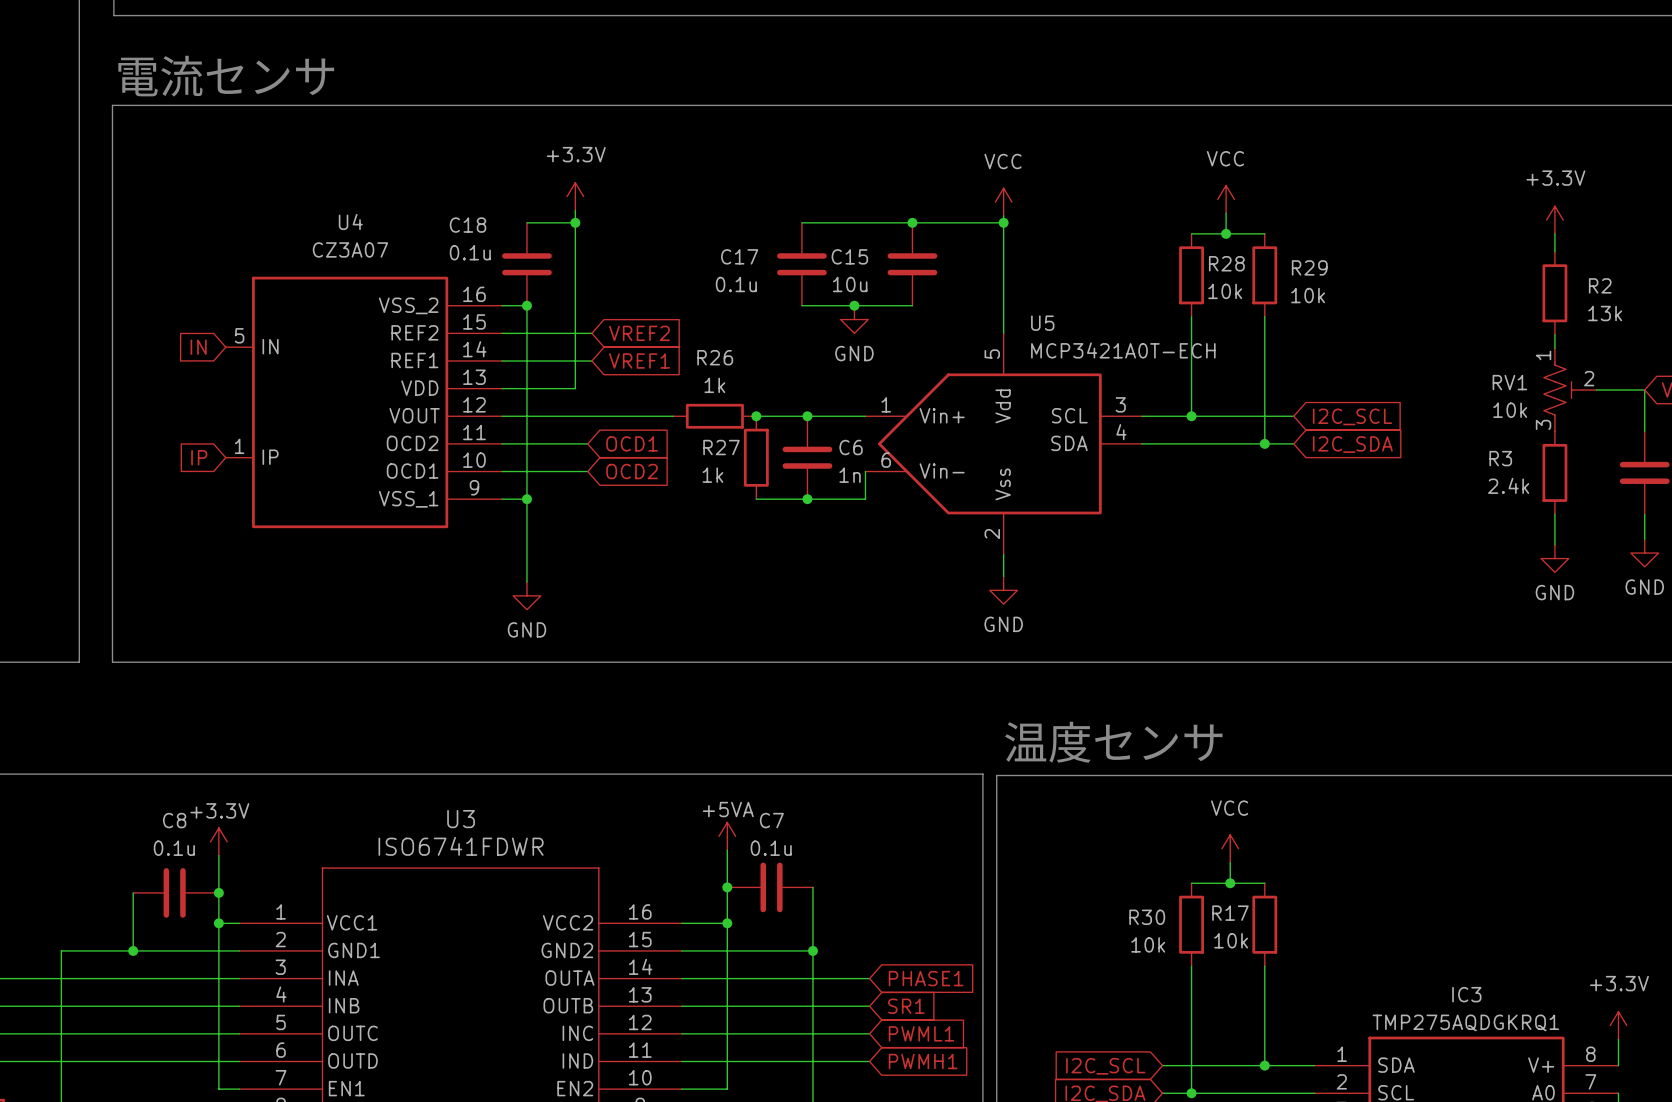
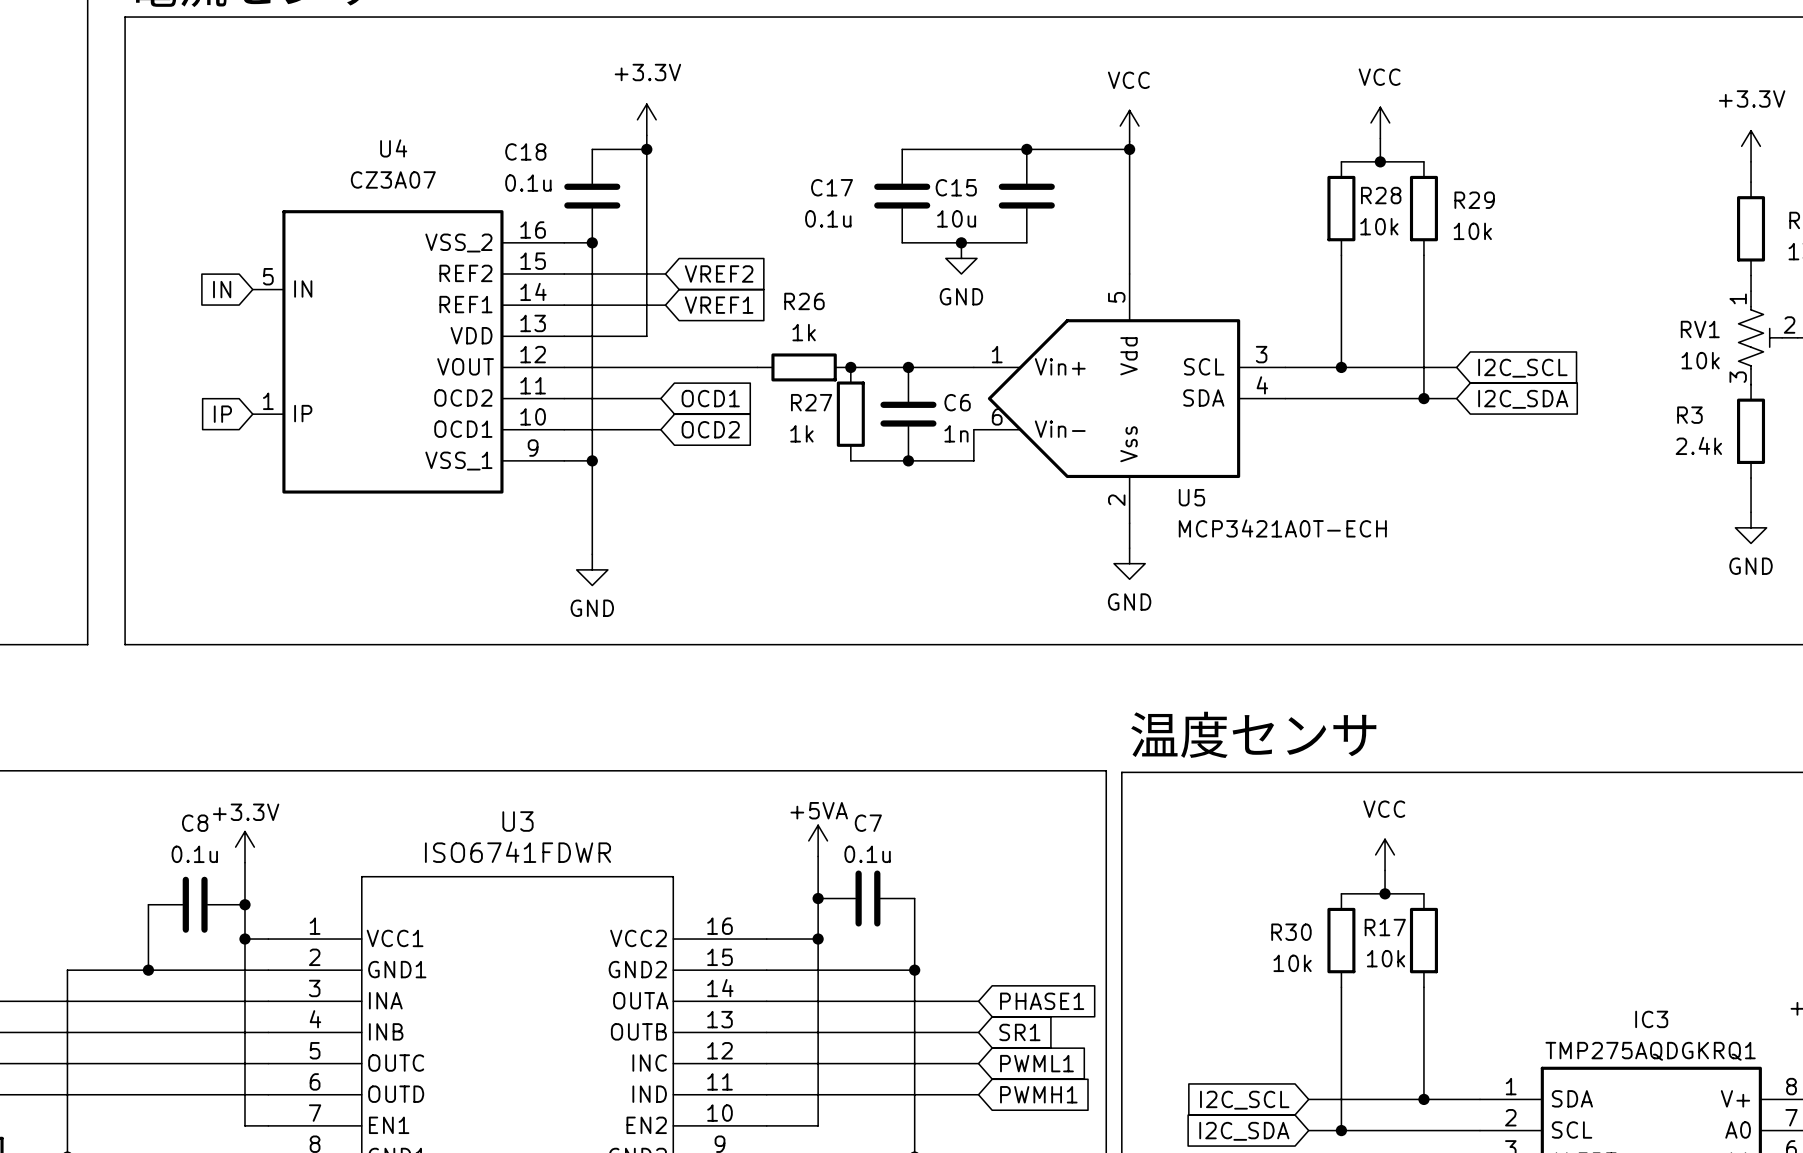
U5 name position: U5 (1042, 323) -> U5 (1191, 497)
U5 value position: MCP3421A0T-ECH (1123, 350) -> MCP3421A0T-ECH (1282, 528)

